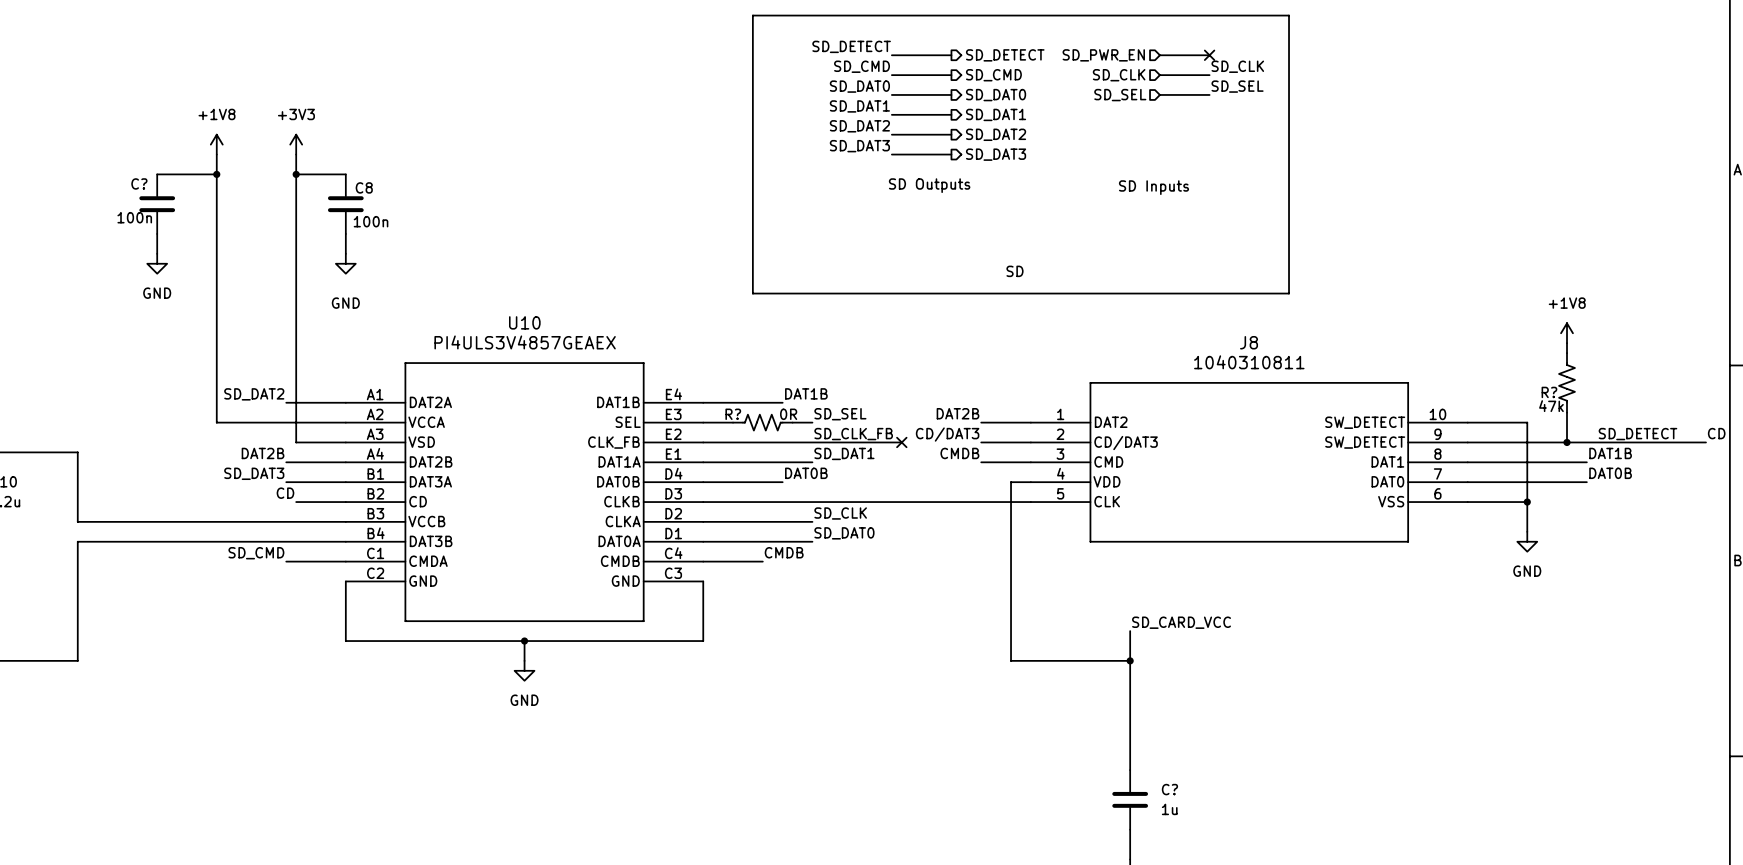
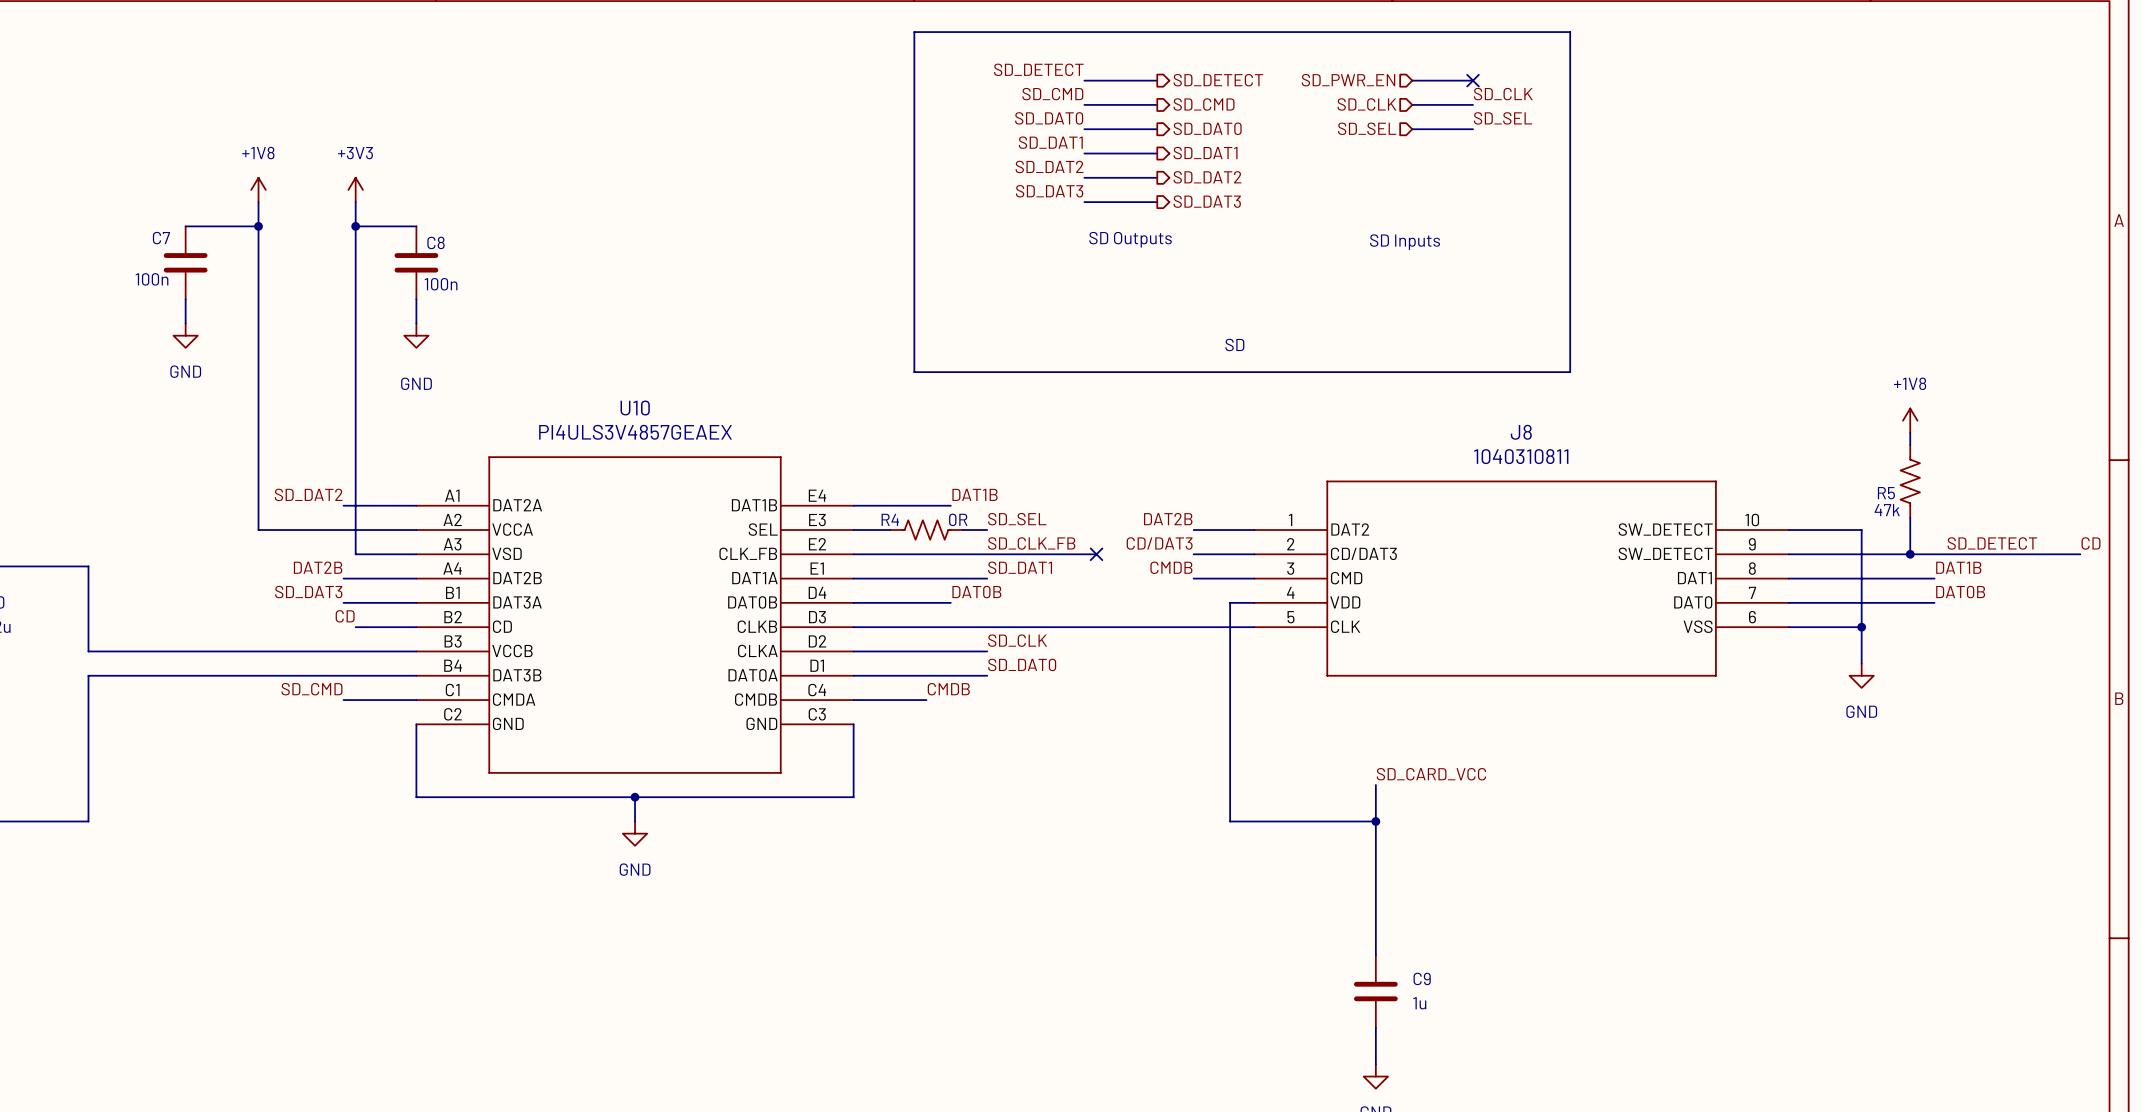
C? name: C? (139, 183) -> C7 (161, 238)
R? name: R? (1549, 392) -> R5 (1886, 493)
R? name: R? (733, 414) -> R4 (890, 519)
C? name: C? (1169, 789) -> C9 (1422, 978)

